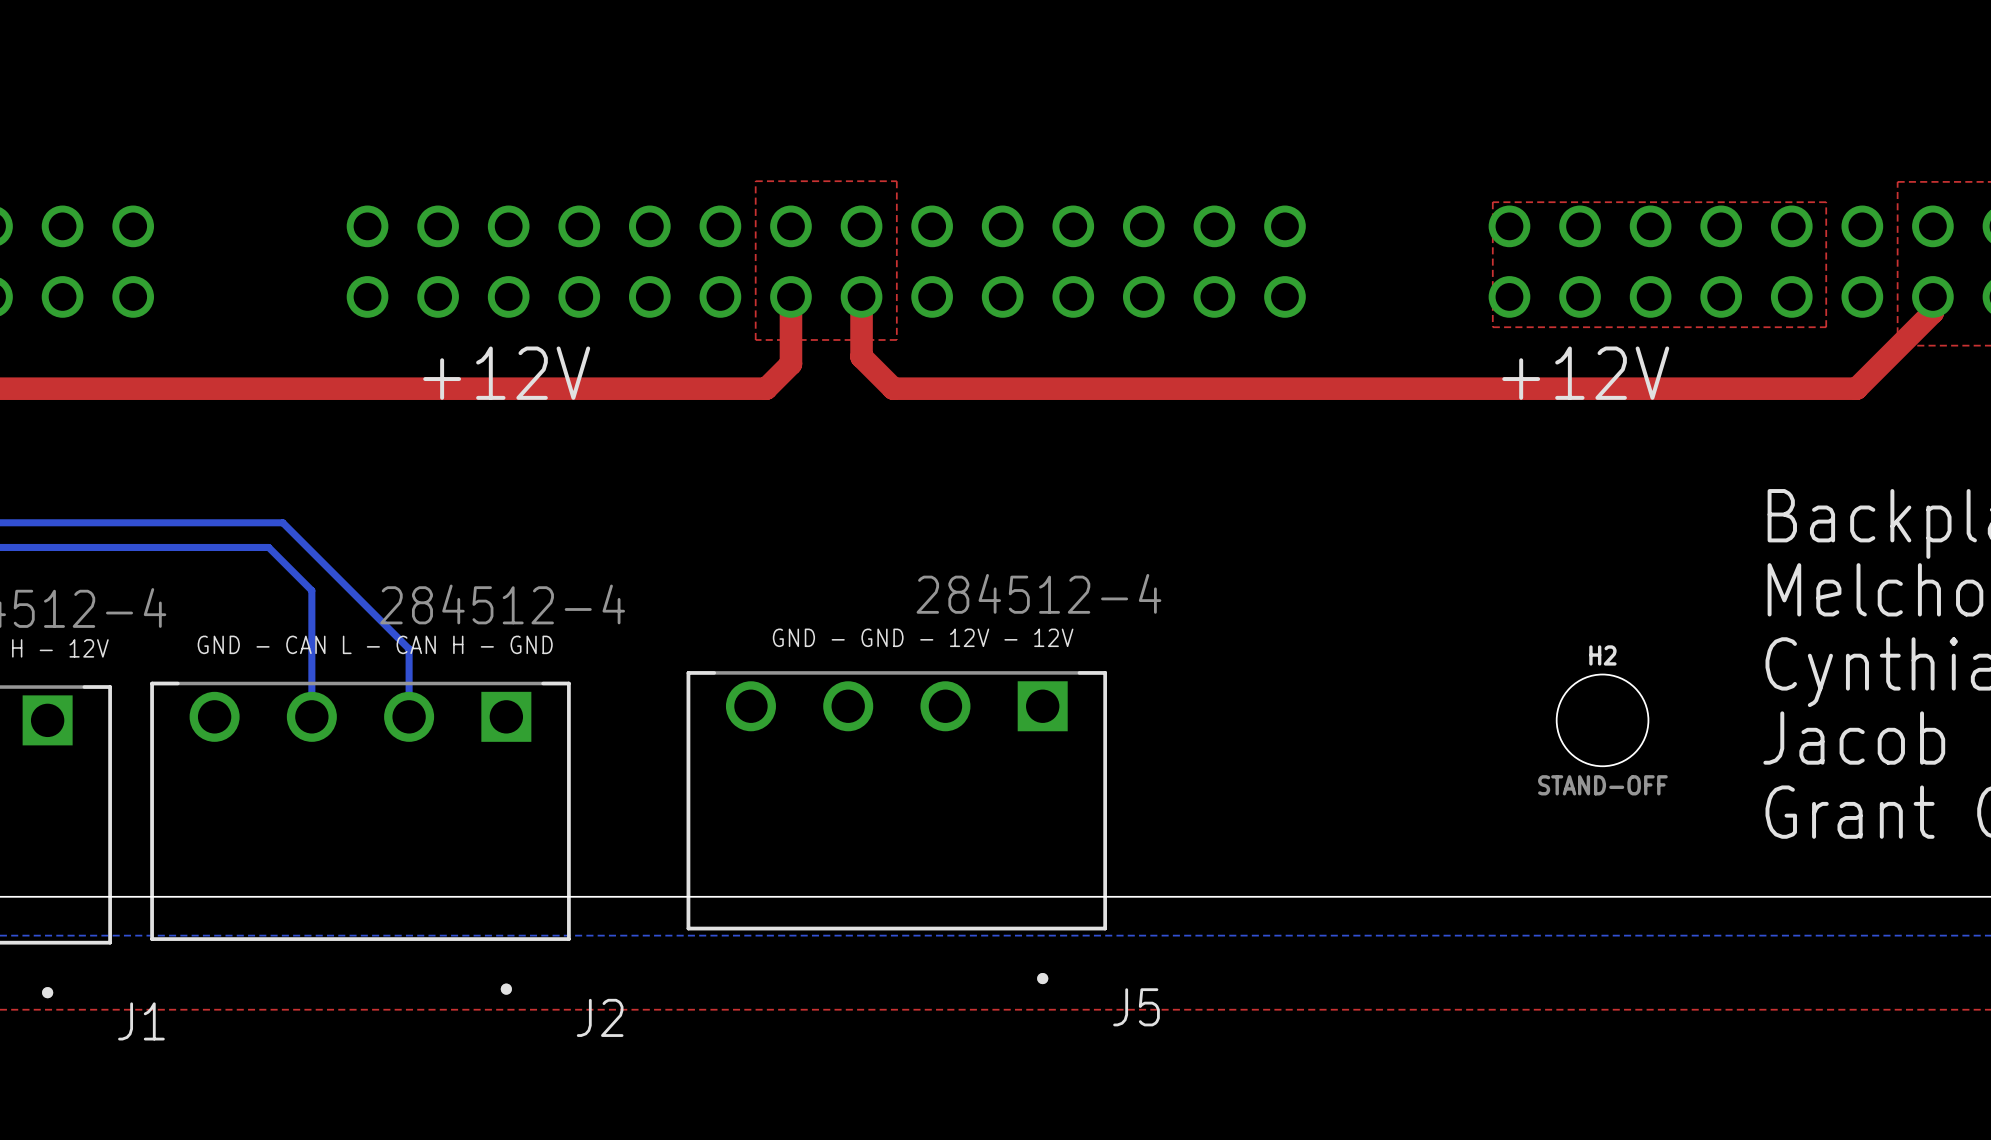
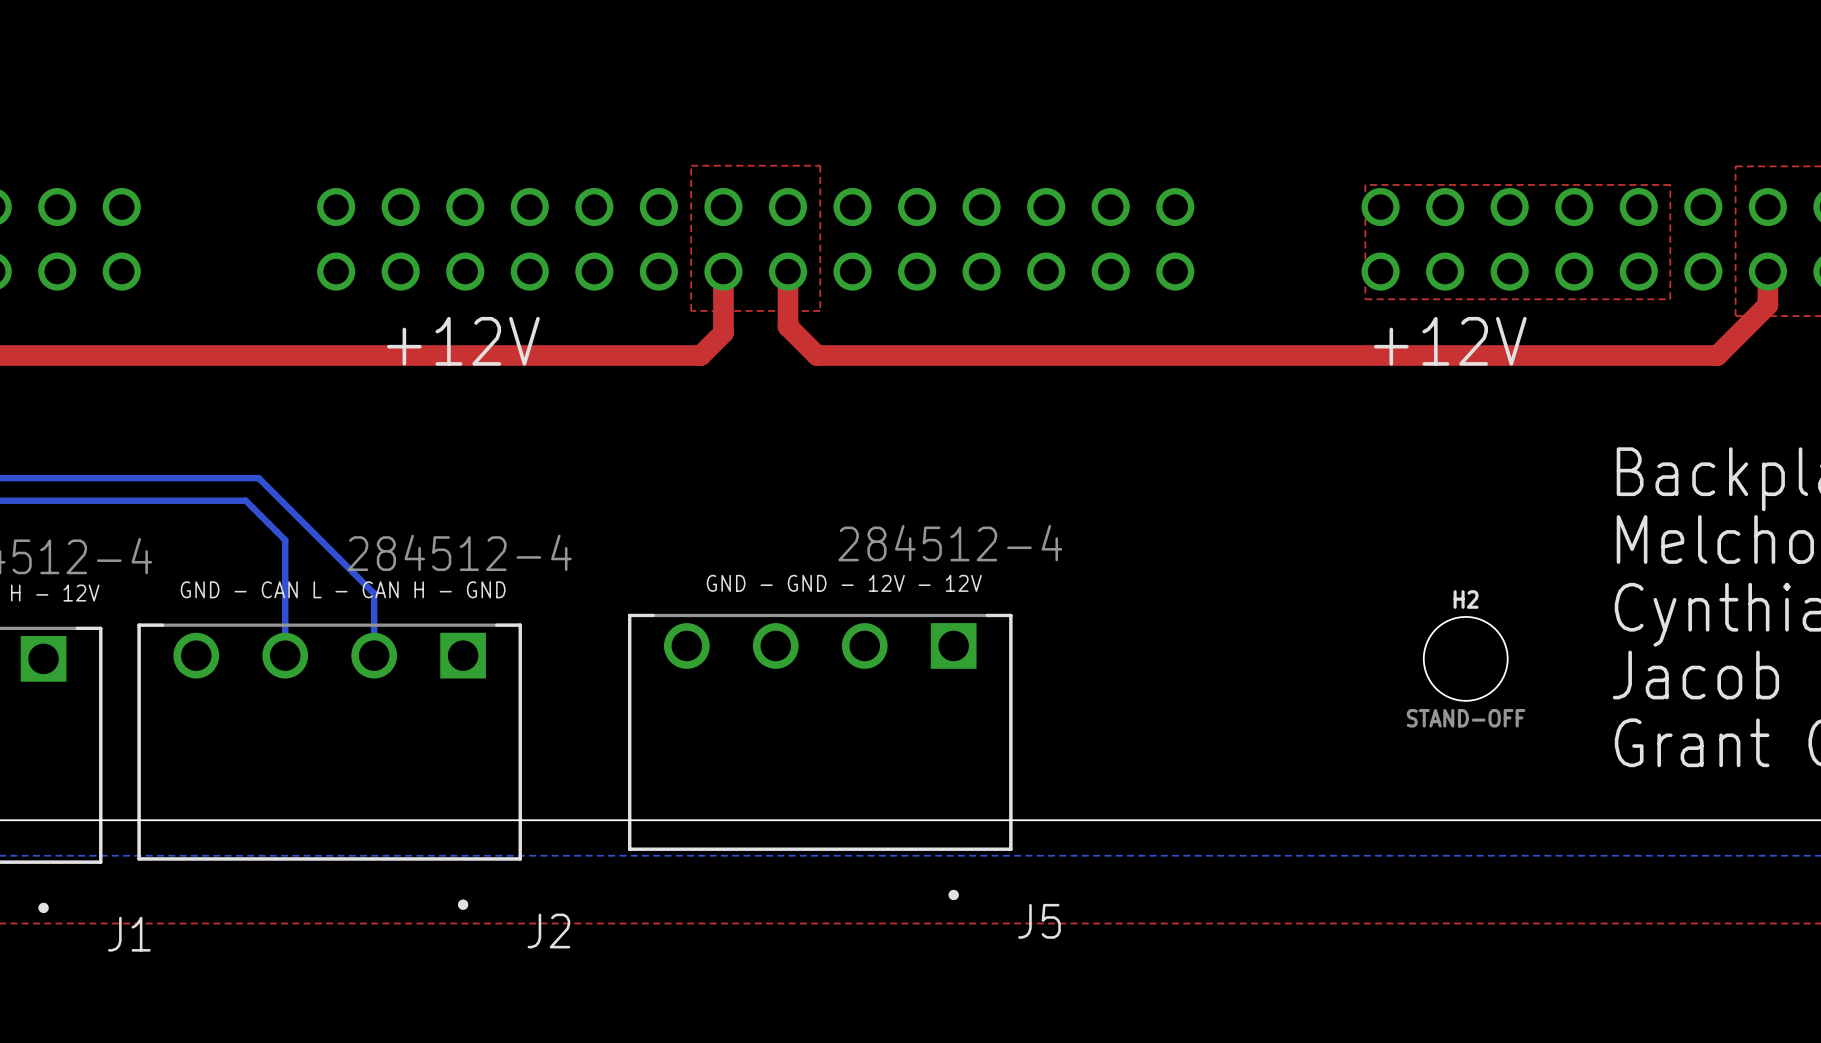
top track: (1932, 312) (1856, 388) -> (1767, 285) (1767, 305) (1717, 355) (1698, 355)

